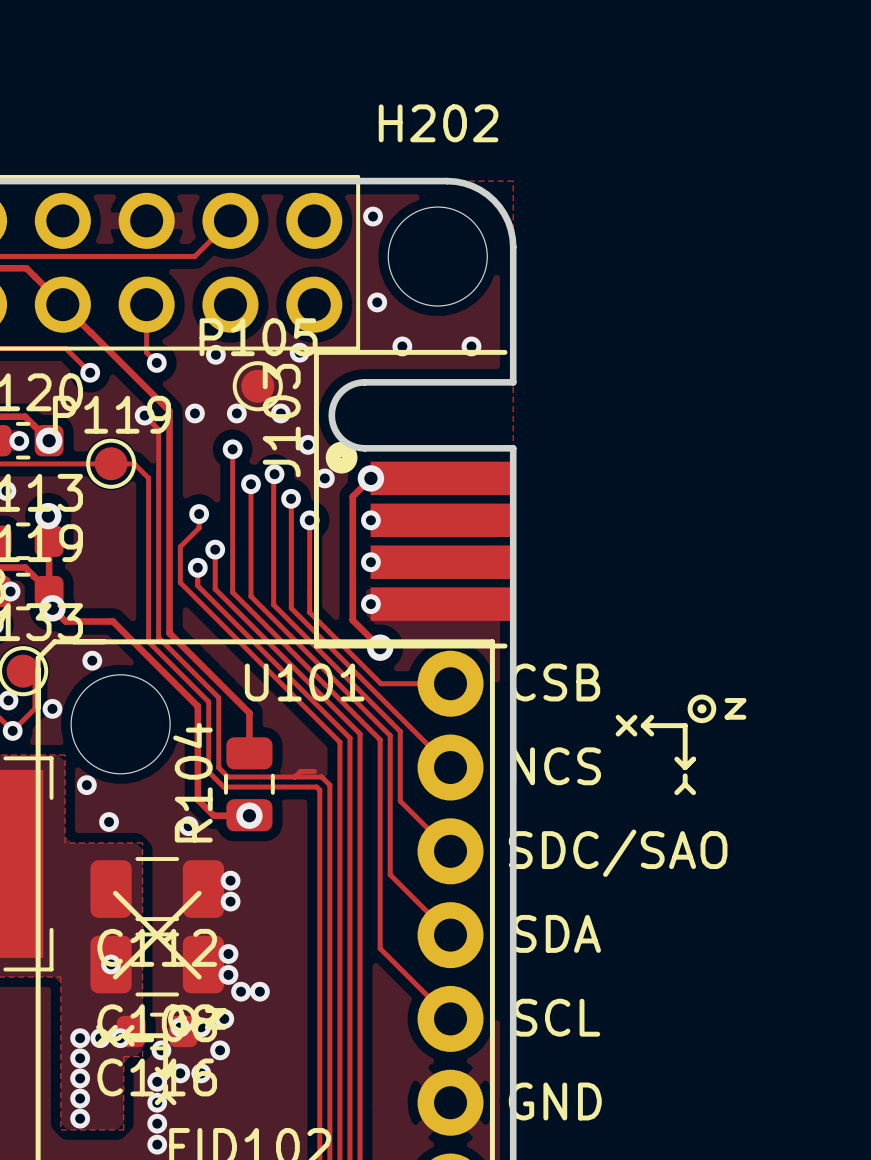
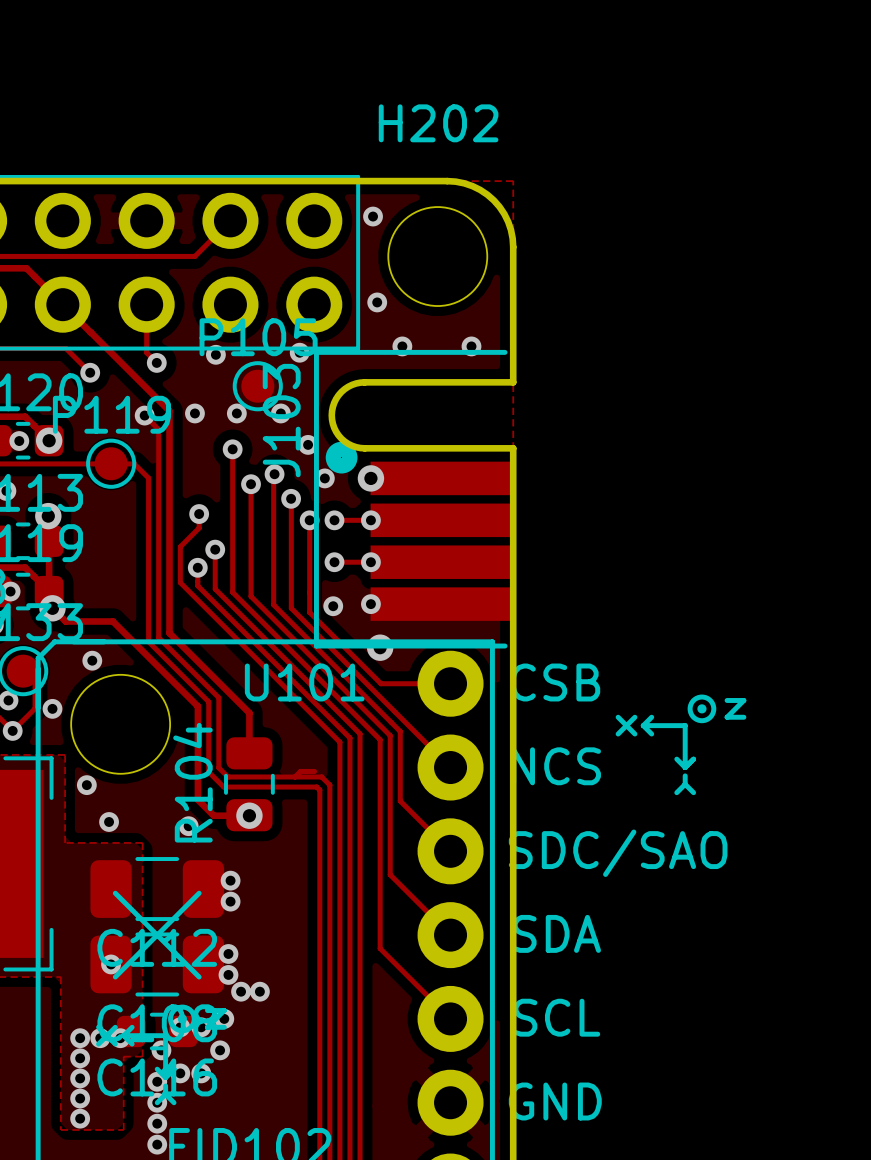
track: (370, 478) (352, 496) (352, 620) (380, 647) -> none
track: none -> (334, 520) (370, 520)
via: none -> (334, 520)
track: none -> (334, 562) (370, 562)
via: none -> (334, 562)
via: none -> (333, 606)

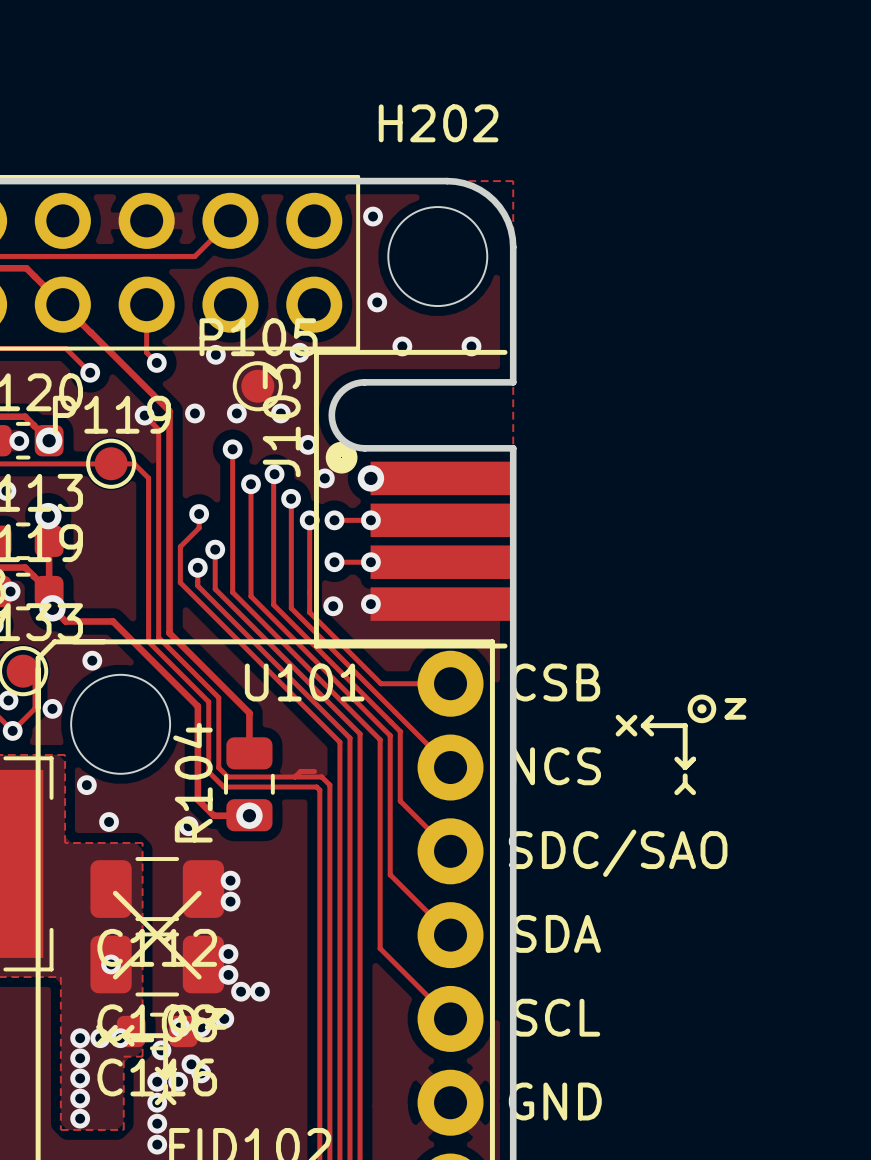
via: (380, 647) -> none
via: (220, 1050) -> none
via: none -> (191, 1064)
via: (180, 1073) -> none
via: none -> (178, 1081)

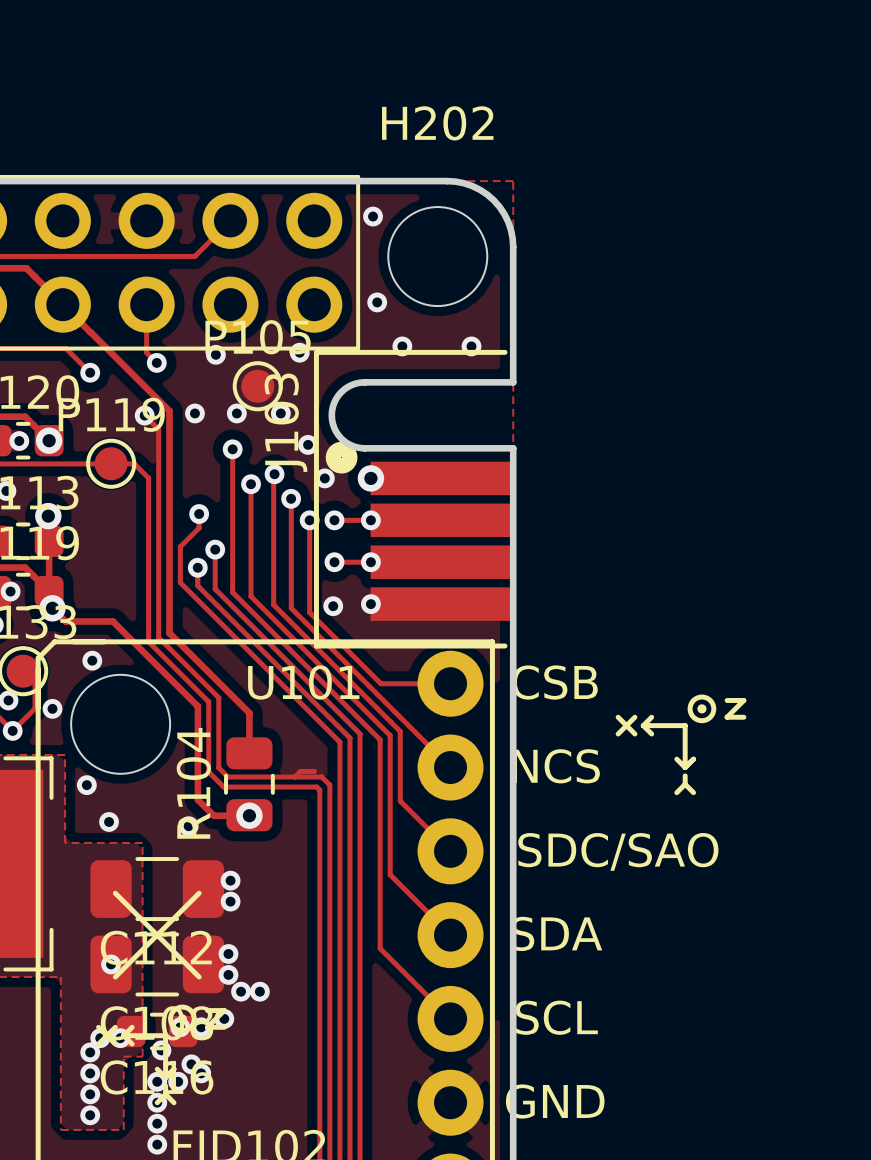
via: (80, 1038) -> none
via: none -> (90, 1052)
via: (80, 1058) -> none
via: none -> (90, 1073)
via: (80, 1078) -> none
via: none -> (90, 1094)
via: (80, 1098) -> none
via: none -> (90, 1115)
via: (80, 1118) -> none

